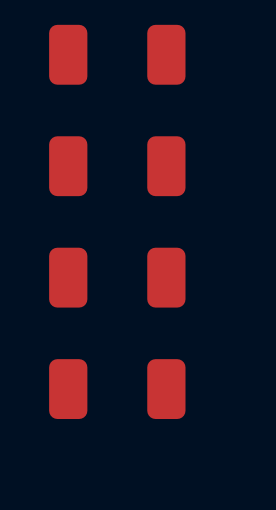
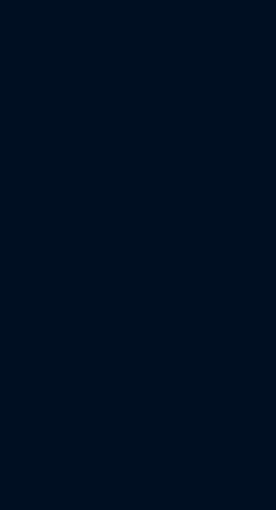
part: (117, 54) -> none
part: (117, 166) -> none
part: (117, 277) -> none
part: (117, 389) -> none

